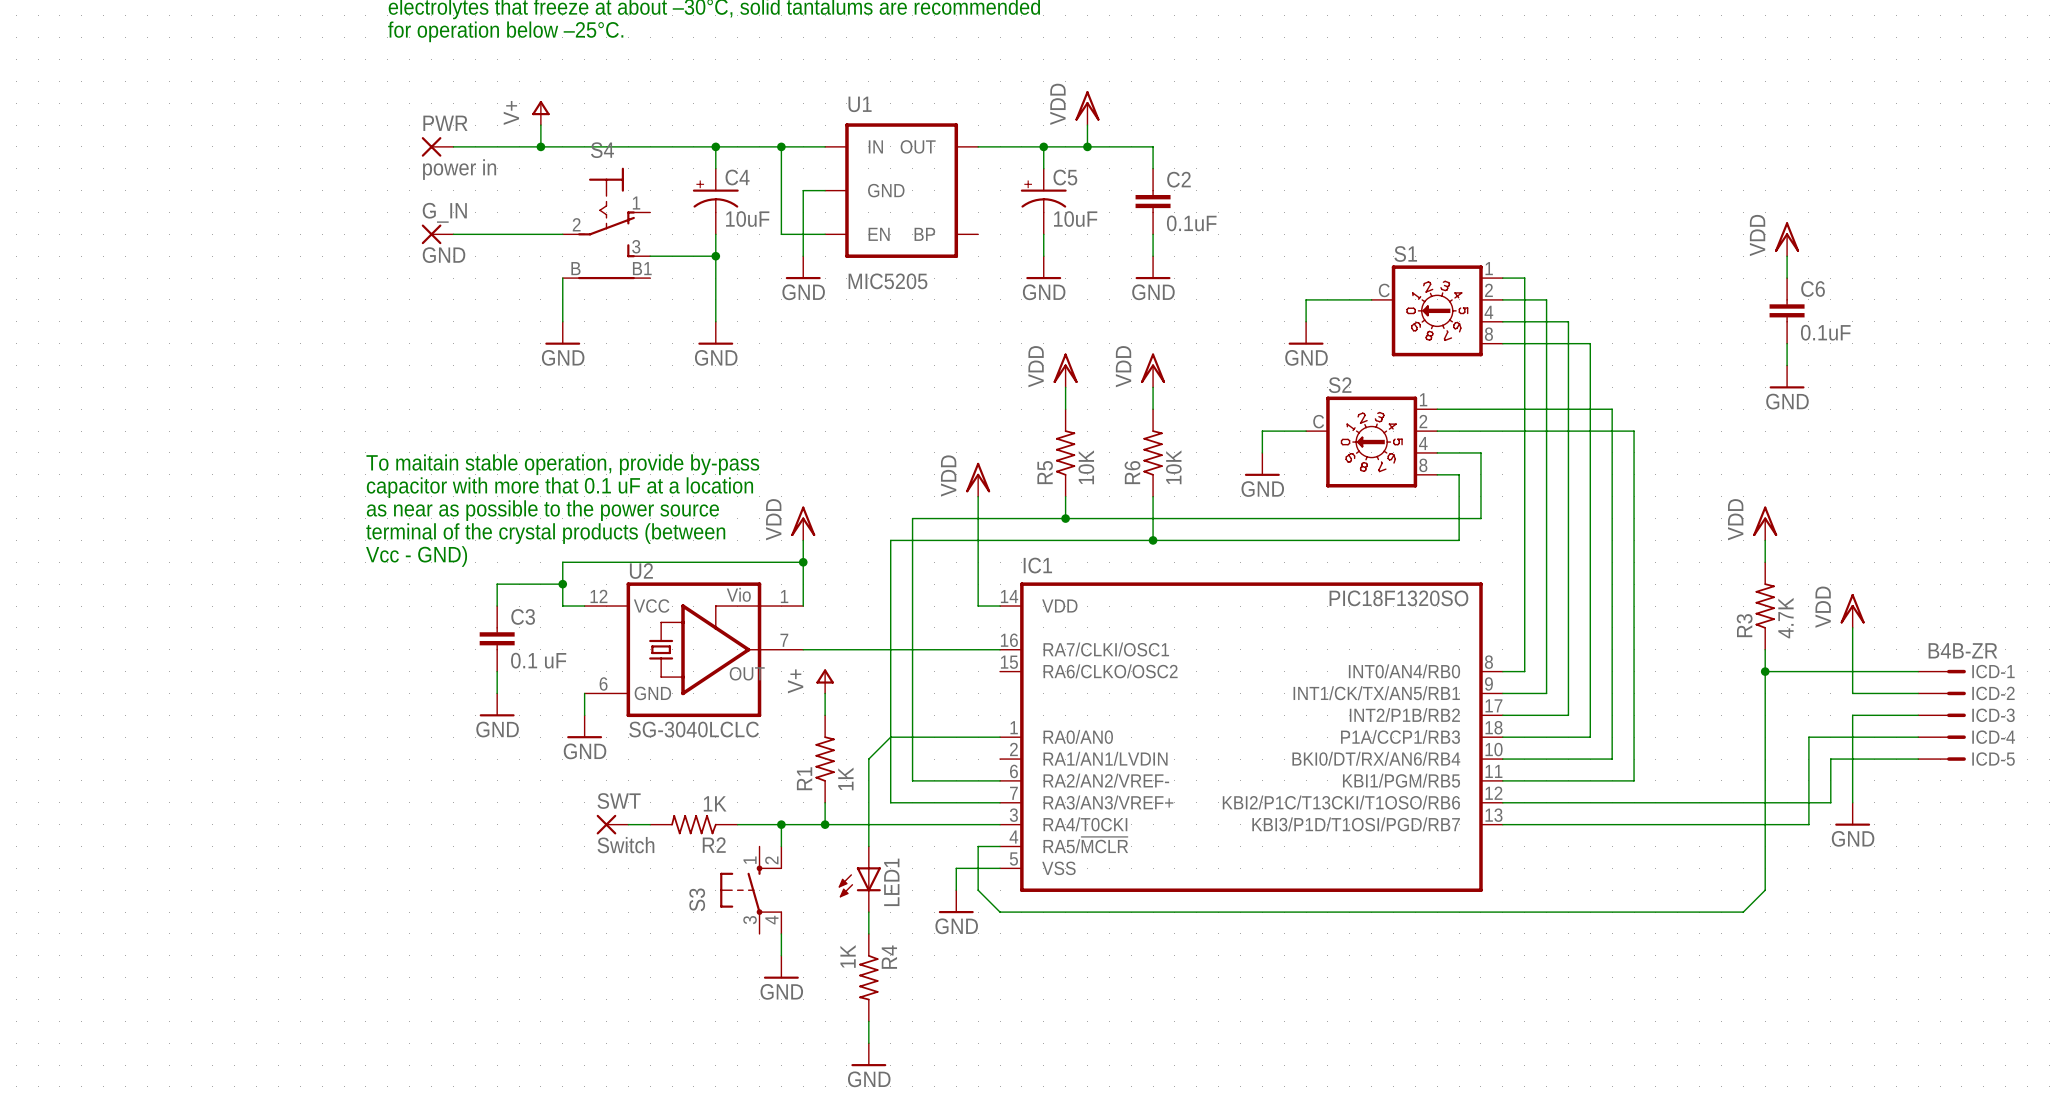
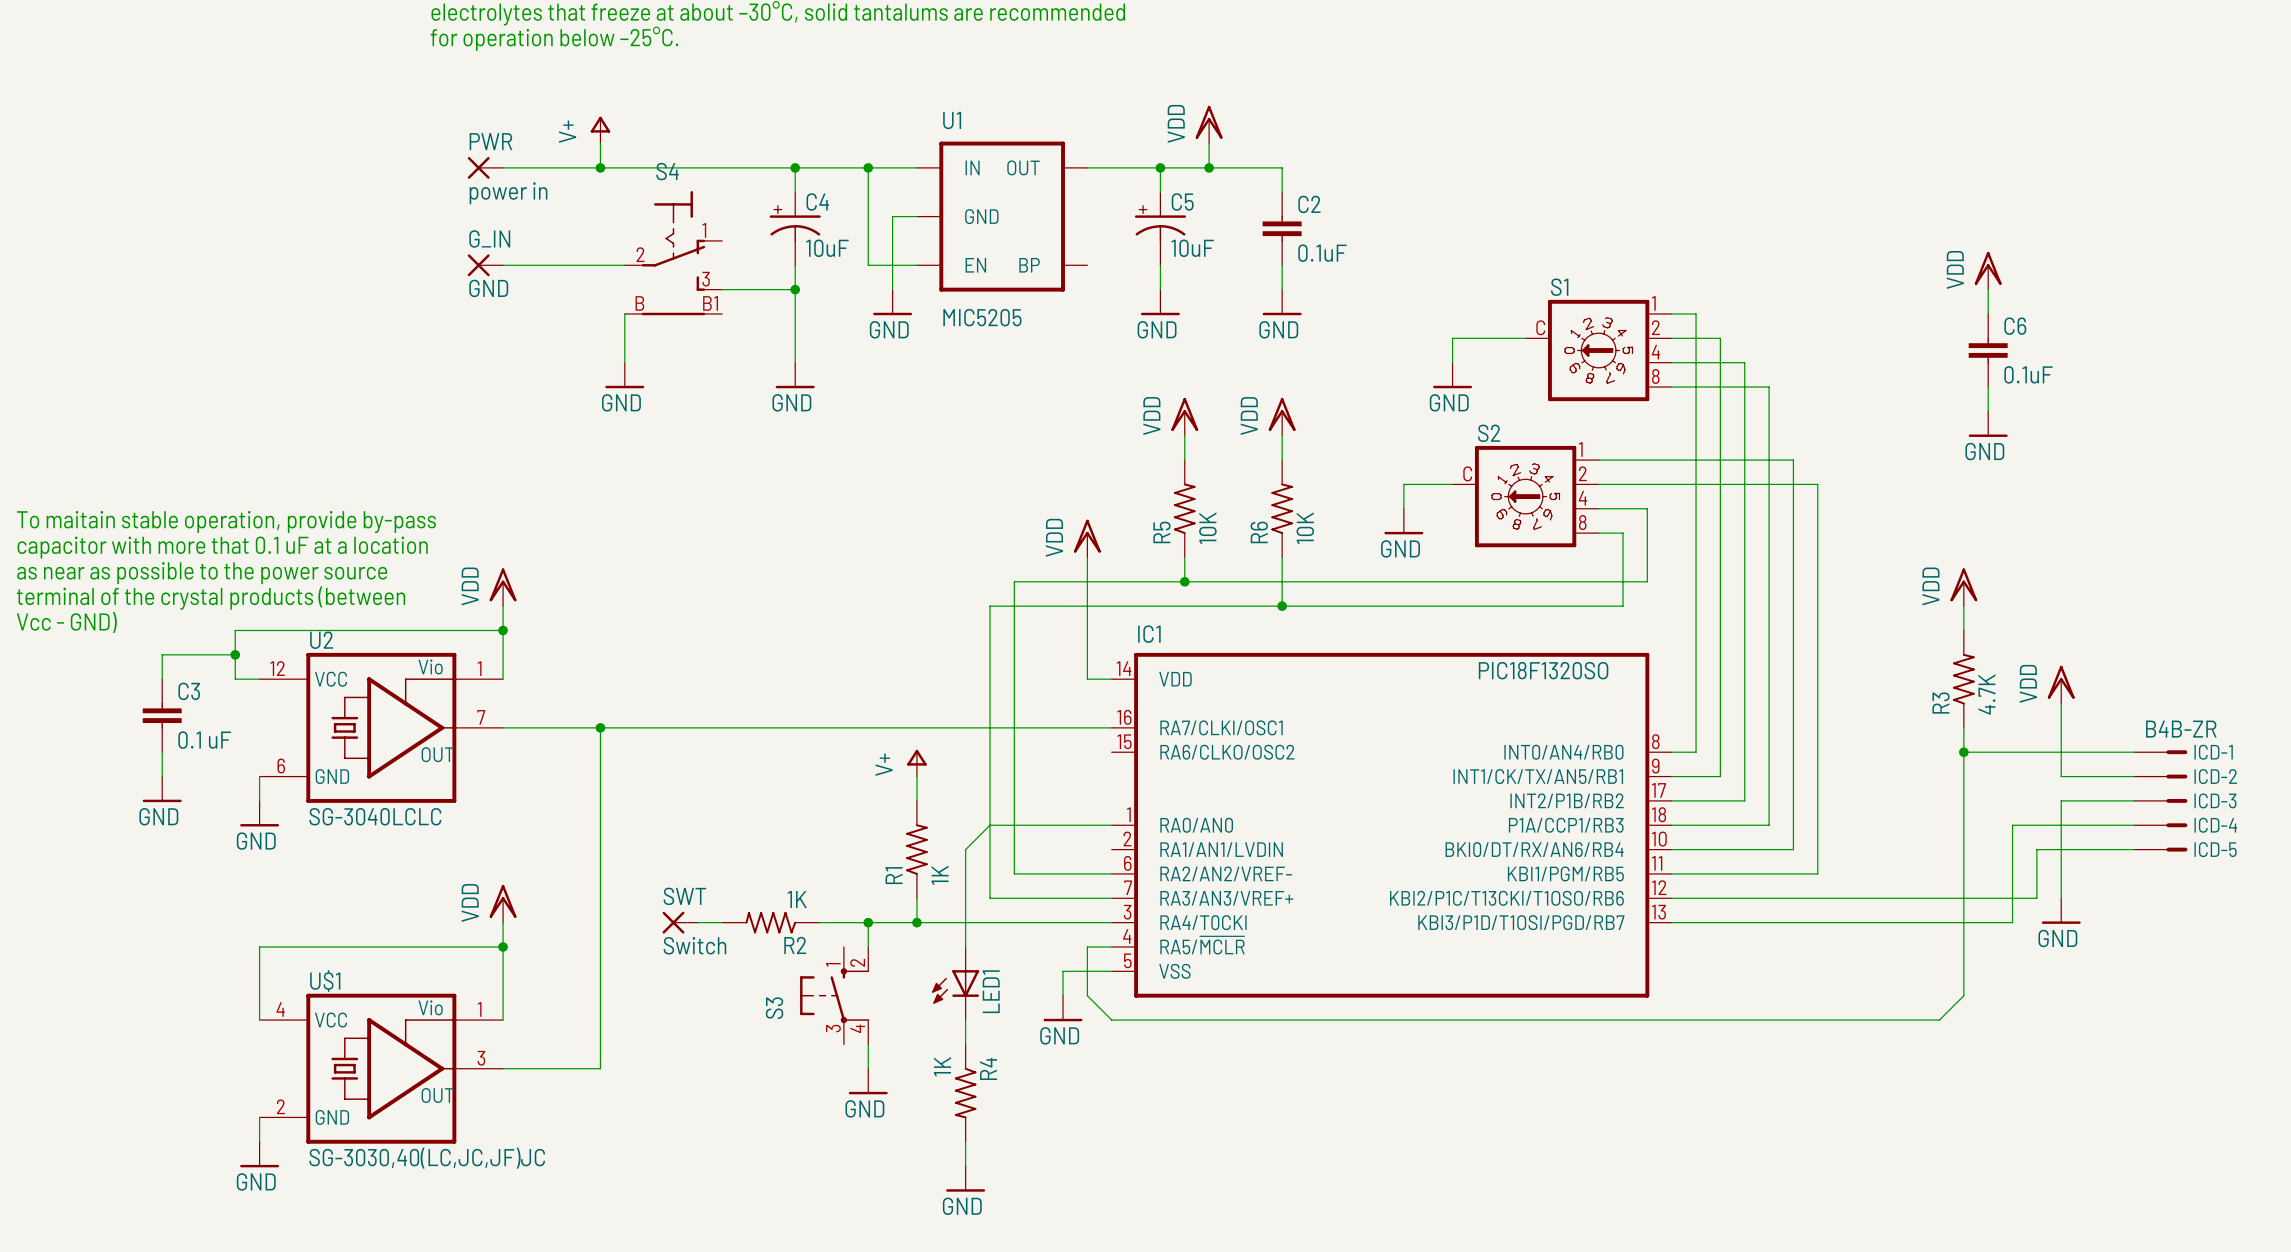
text: none -> To maitain stable operation, provide by-pass (226, 522)
text: To maitain stable operation, provide by-pass (562, 464) -> none
text: none -> capacitor with more that 0.1 uF at a location (222, 547)
text: capacitor with more that 0.1 uF at a location (559, 487) -> none
text: none -> as near as possible to the power source (202, 573)
text: as near as possible to the power source (542, 510) -> none
power symbol: none -> VDD (503, 587)
power symbol: VDD (803, 523) -> none
text: none -> terminal of the crystal products (between (211, 598)
text: terminal of the crystal products (between (545, 533) -> none
wire: none -> (503, 606) (503, 679)
wire: (803, 540) (803, 606) -> none
text: none -> Vcc - GND) (66, 622)
text: Vcc - GND) (416, 556) -> none
wire: none -> (503, 630) (235, 630) (235, 679) (259, 679)
junction: none -> (503, 630)
wire: (803, 562) (562, 562) (562, 606) (584, 606) -> none
junction: (803, 562) -> none
wire: none -> (235, 654) (162, 654) (162, 679)
junction: none -> (235, 654)
wire: (562, 584) (497, 584) (497, 606) -> none
junction: (562, 584) -> none
C3 position: (497, 638) -> (162, 715)
wire: none -> (503, 727) (892, 727)
wire: none -> (600, 727) (600, 1068) (503, 1068)
junction: none -> (600, 727)
U2 position: (693, 649) -> (381, 727)
wire: none -> (162, 752) (162, 776)
wire: (497, 671) (497, 693) -> none
wire: none -> (259, 776) (259, 800)
wire: (584, 693) (584, 715) -> none
power symbol: none -> GND (162, 789)
power symbol: GND (497, 704) -> none
power symbol: none -> GND (259, 813)
power symbol: GND (584, 726) -> none
power symbol: none -> VDD (503, 903)
wire: none -> (503, 922) (503, 1020)
wire: none -> (503, 946) (259, 946) (259, 1020)
junction: none -> (503, 946)
U$1: none -> SG-3030,40(LC,JC,JF)JC (381, 1068)
wire: none -> (259, 1117) (259, 1141)
power symbol: none -> GND (259, 1154)

